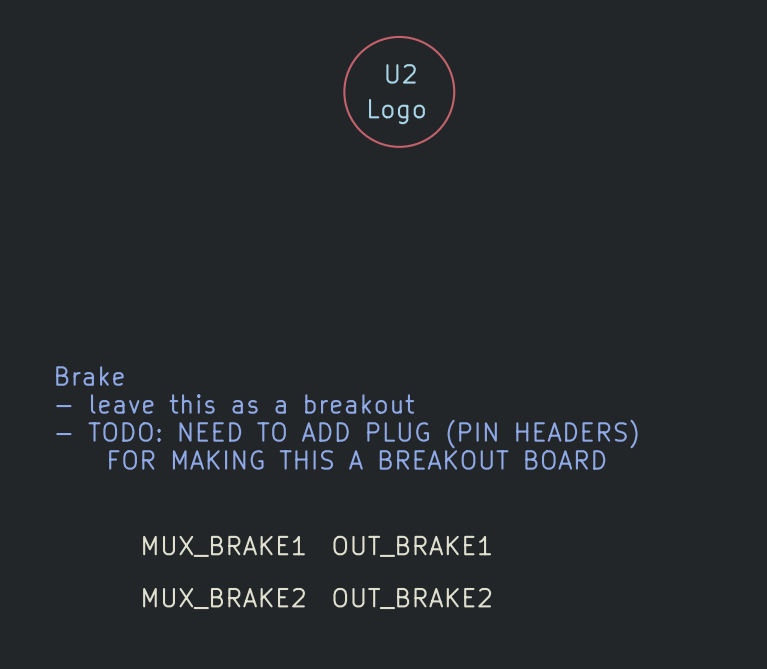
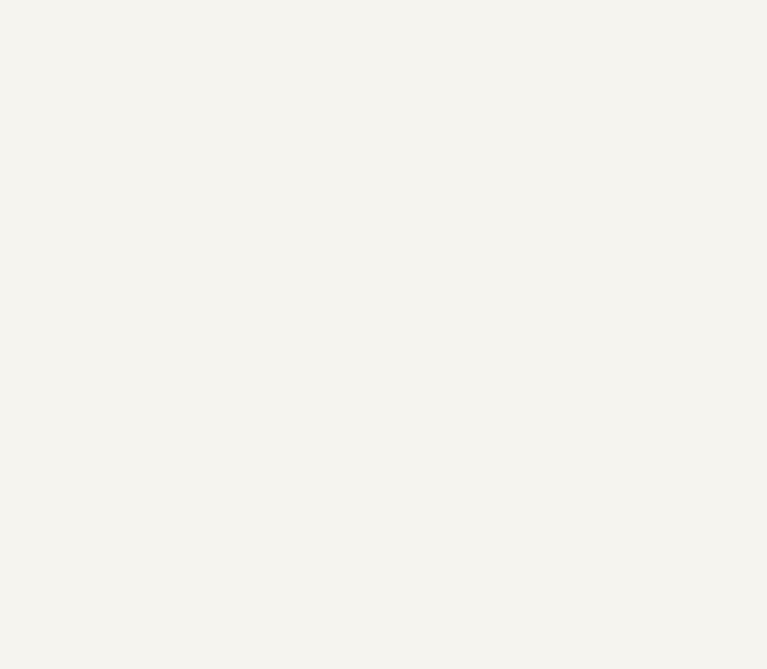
U2: Logo (399, 91) -> none
text: Brake (89, 376) -> none
text: - leave this as a breakout (235, 403) -> none
text: - TODO: NEED TO ADD PLUG (PIN HEADERS) (346, 434) -> none
text: FOR MAKING THIS A BREAKOUT BOARD (357, 459) -> none
label: MUX_BRAKE1 (224, 546) -> none
label: OUT_BRAKE1 (412, 546) -> none
label: MUX_BRAKE2 (224, 598) -> none
label: OUT_BRAKE2 (412, 598) -> none

